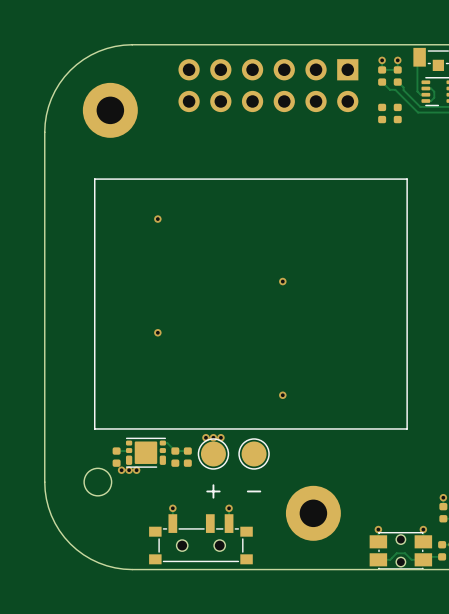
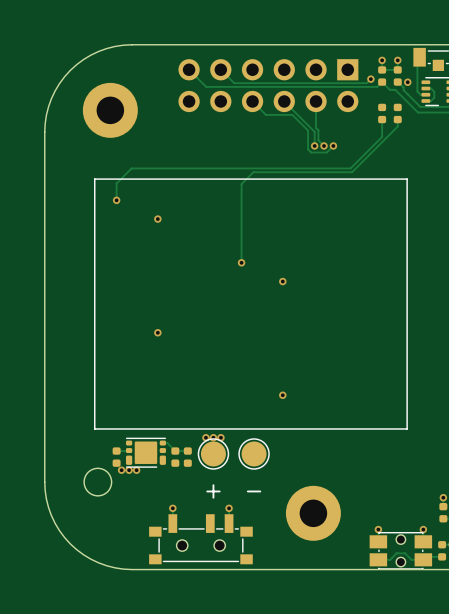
track: none -> (189, 69) (206, 86) (377, 86) (382, 82)
track: none -> (220, 69) (234, 83) (366, 83) (370, 79)
via: none -> (370, 79)
via: none -> (407, 82)
track: none -> (252, 101) (265, 114) (292, 114) (308, 130) (308, 149) (311, 152) (326, 152) (333, 145)
track: none -> (284, 101) (314, 131) (314, 145)
track: none -> (316, 101) (316, 127) (318, 130) (318, 140) (324, 145)
track: none -> (382, 119) (382, 136) (350, 168) (131, 168) (116, 183) (116, 200)
track: none -> (397, 119) (397, 126) (352, 172) (253, 172) (241, 184) (241, 262)
via: none -> (314, 145)
via: none -> (324, 145)
via: none -> (333, 145)
via: none -> (116, 200)
via: none -> (241, 262)

